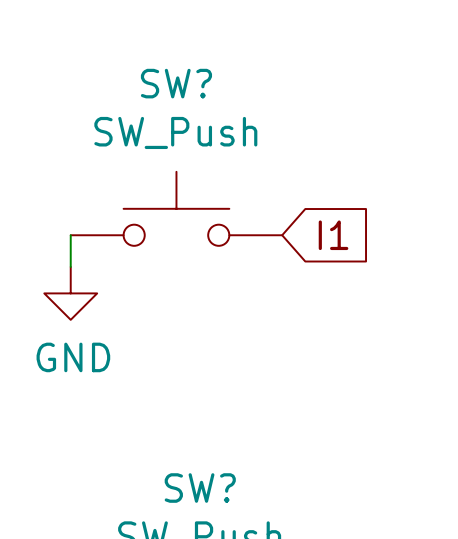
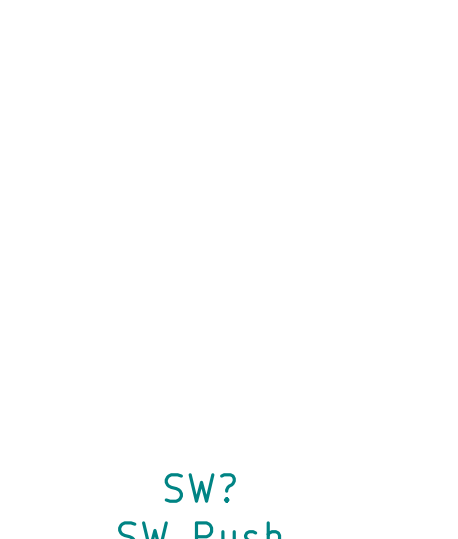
SW?: SW_Push (176, 208) -> none
wire: (70, 235) (70, 266) -> none
global label: I1 (333, 235) -> none
power symbol: GND (70, 293) -> none

